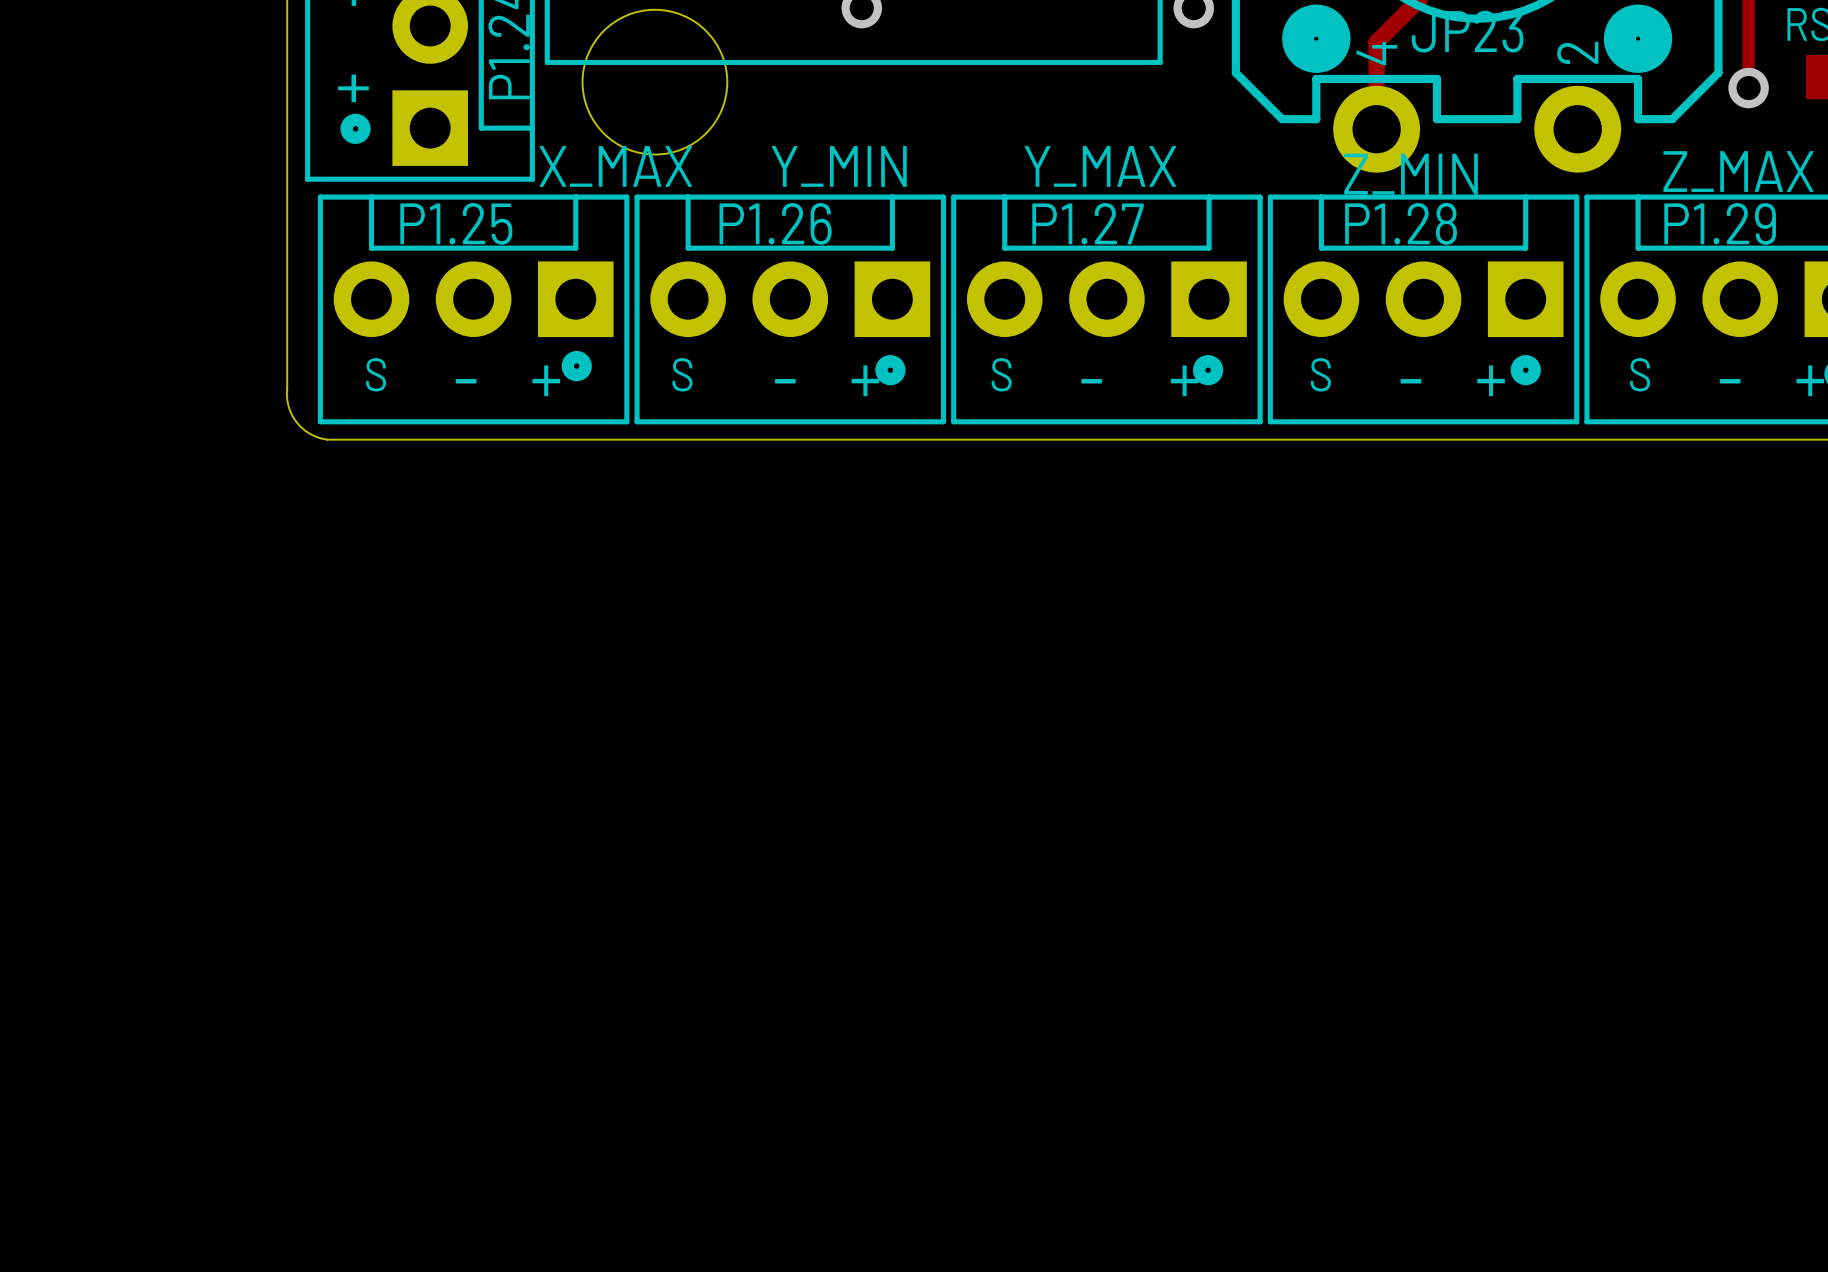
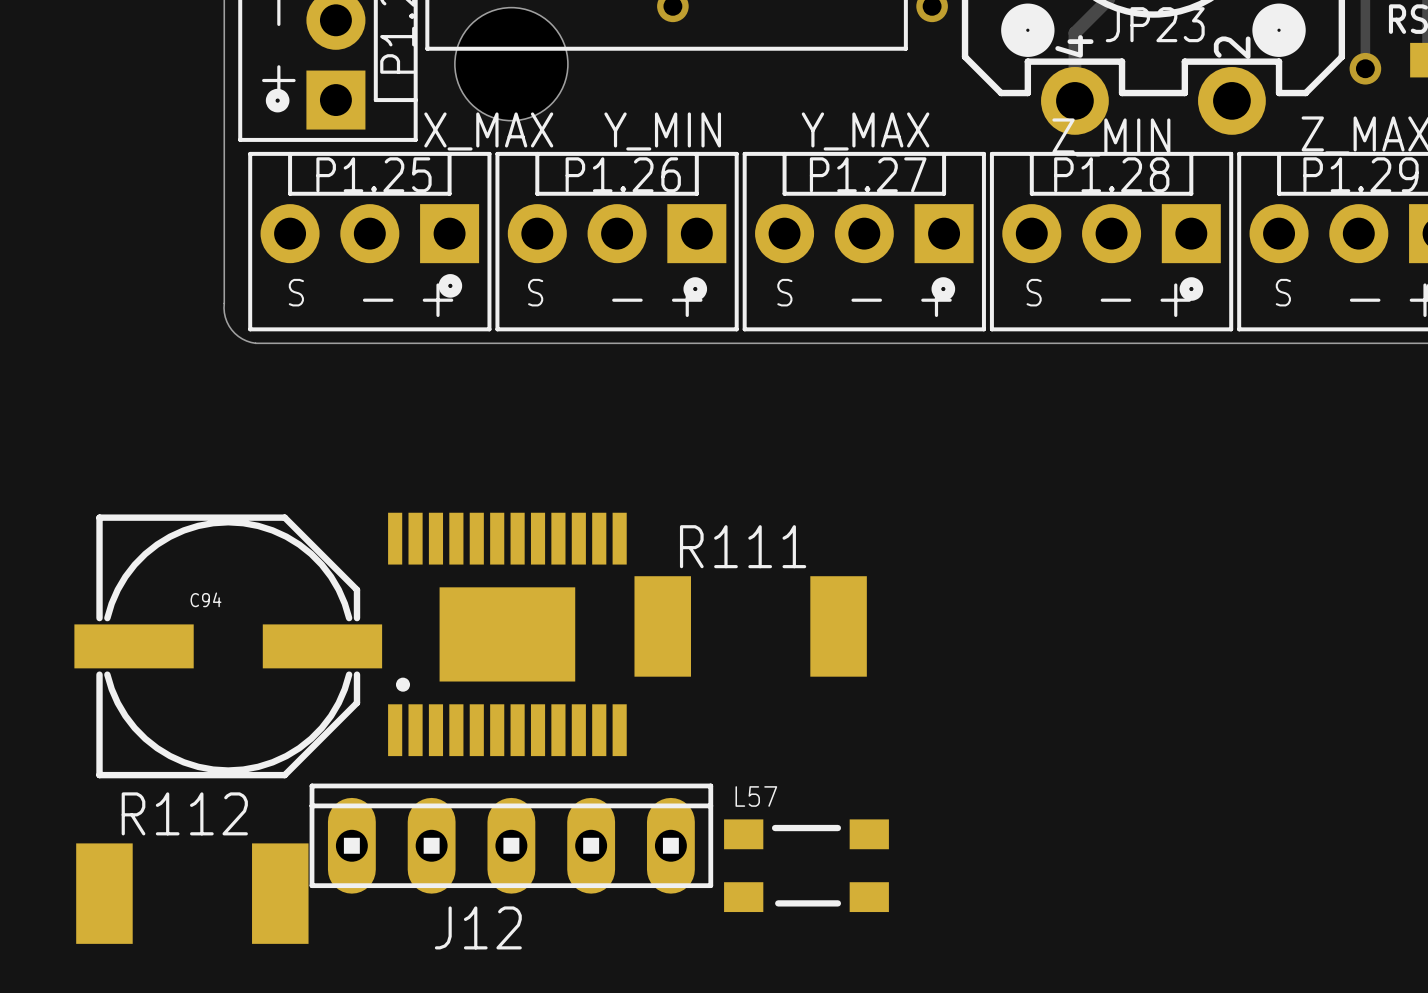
R111: none -> (750, 626)
part: none -> (507, 634)
C94: none -> (228, 646)
J12: none -> (511, 838)
L57: none -> (806, 865)
R112: none -> (192, 893)

